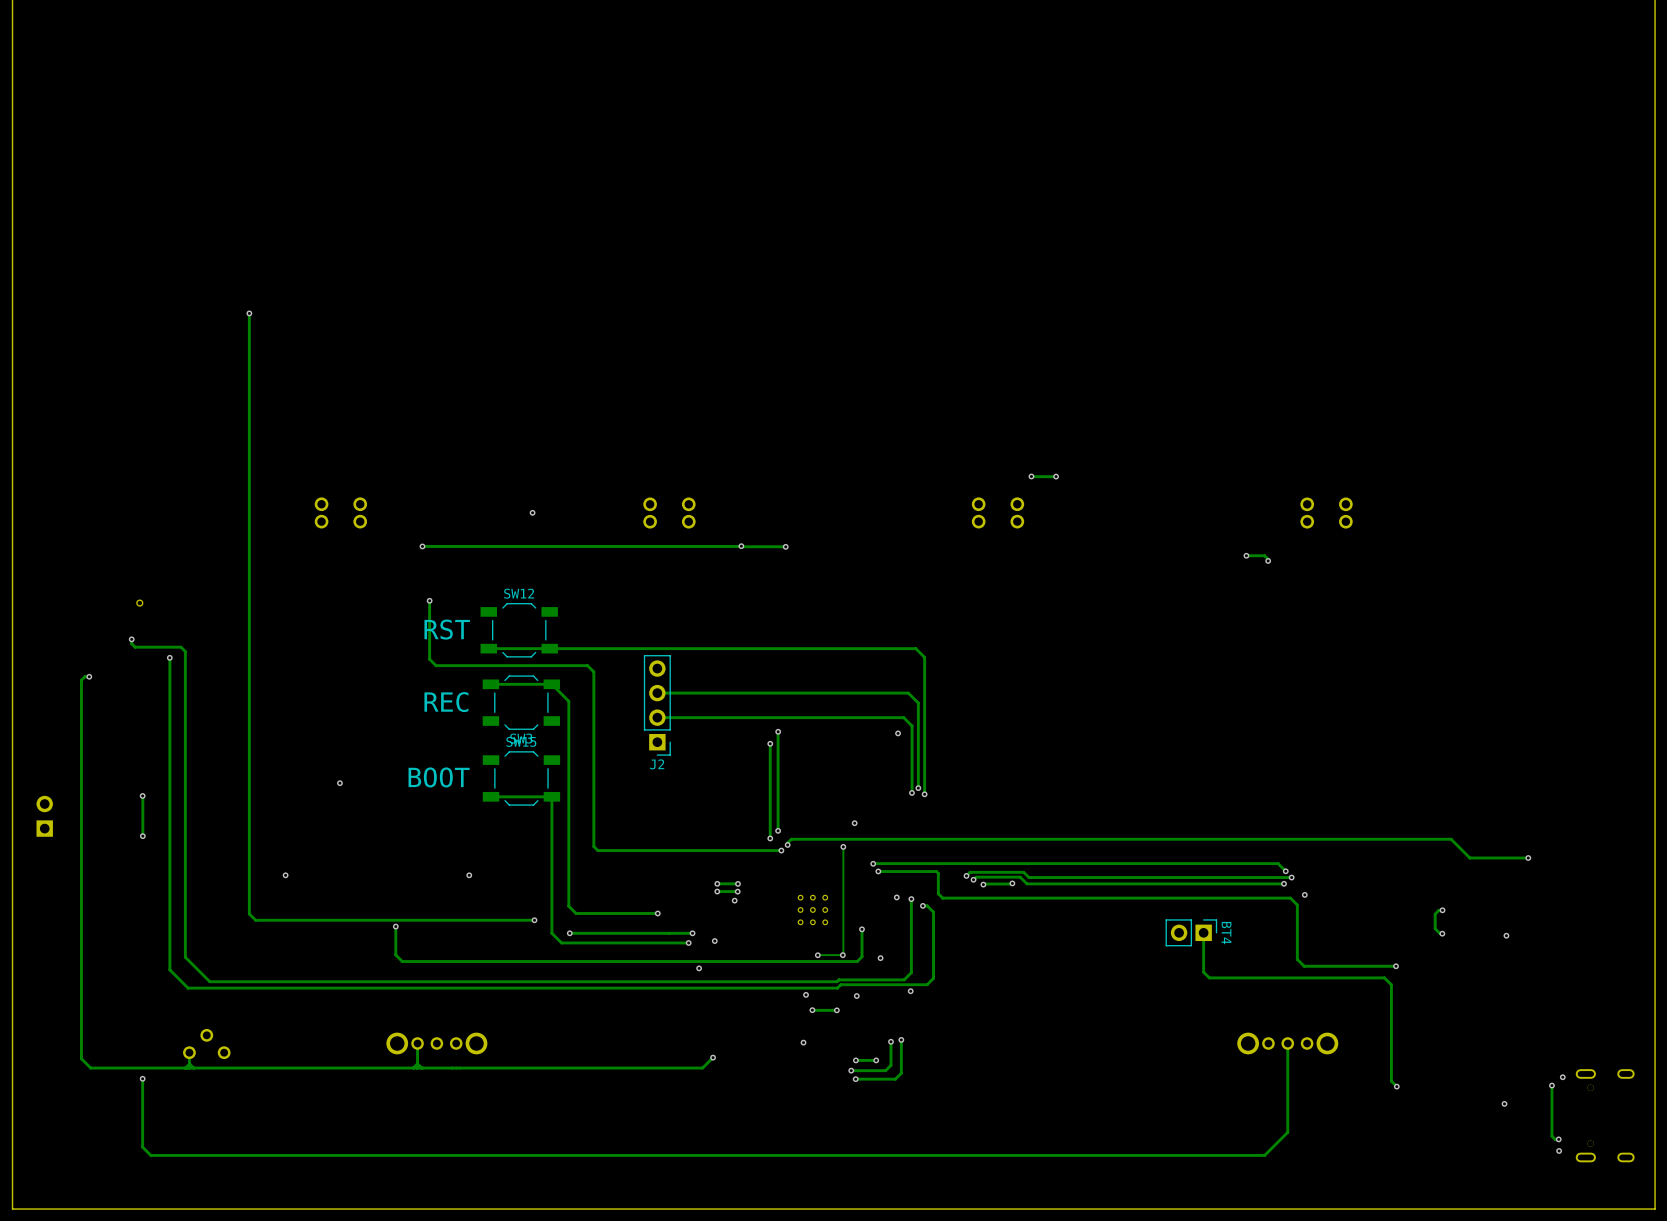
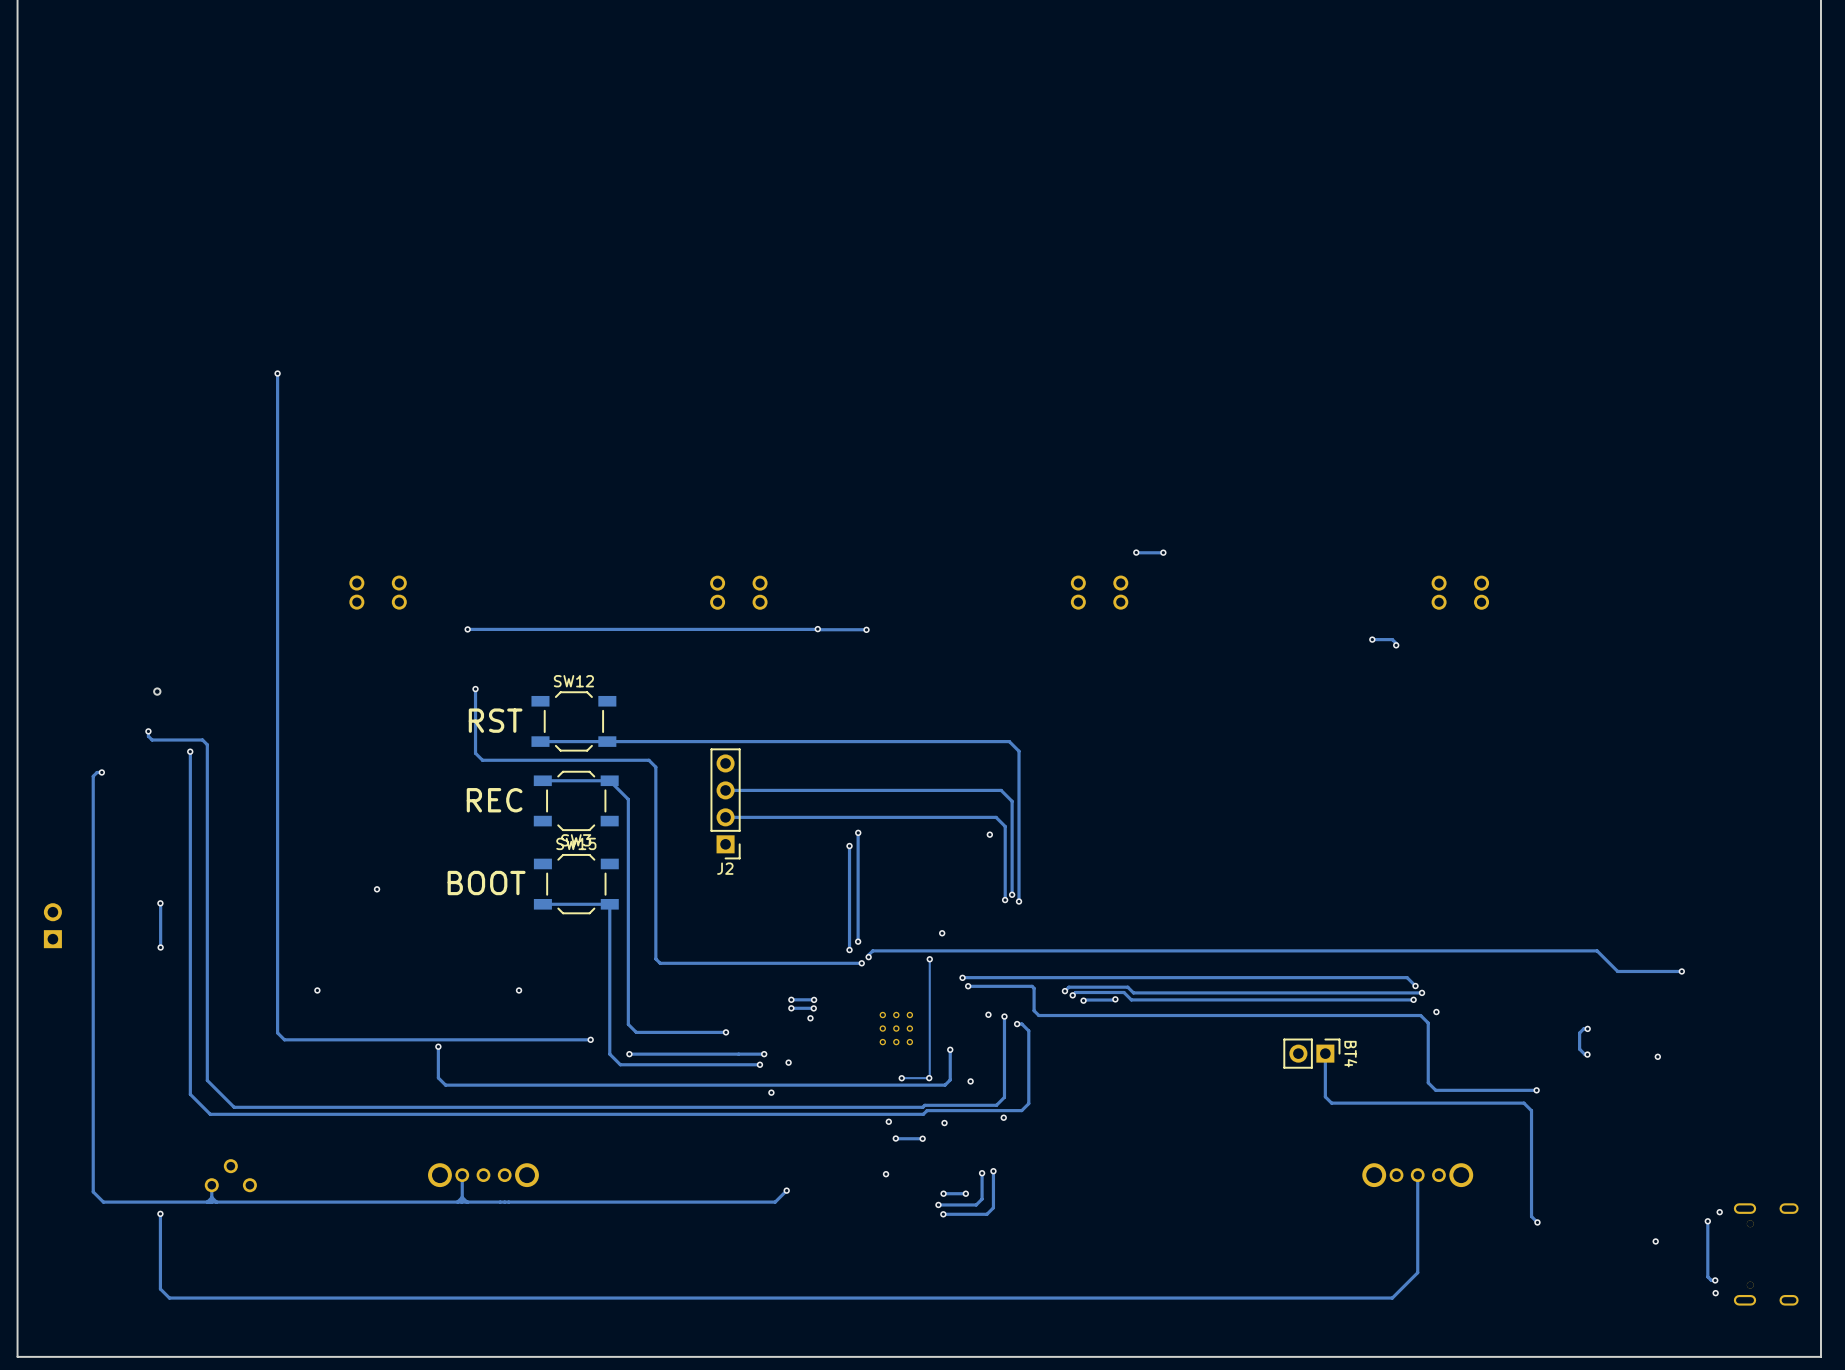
via: (532, 512) -> none

